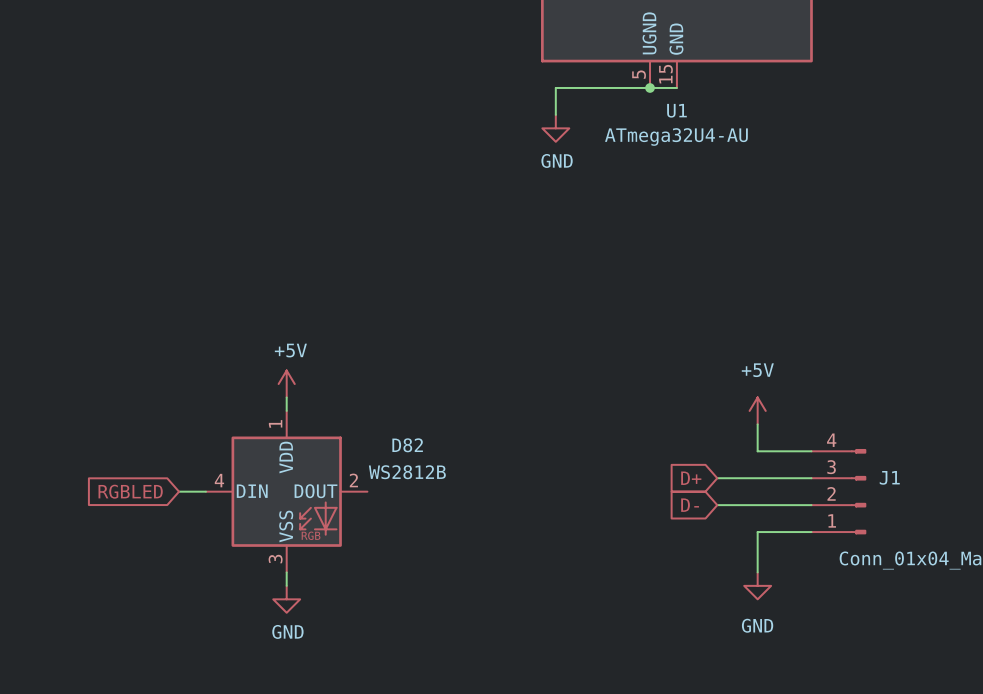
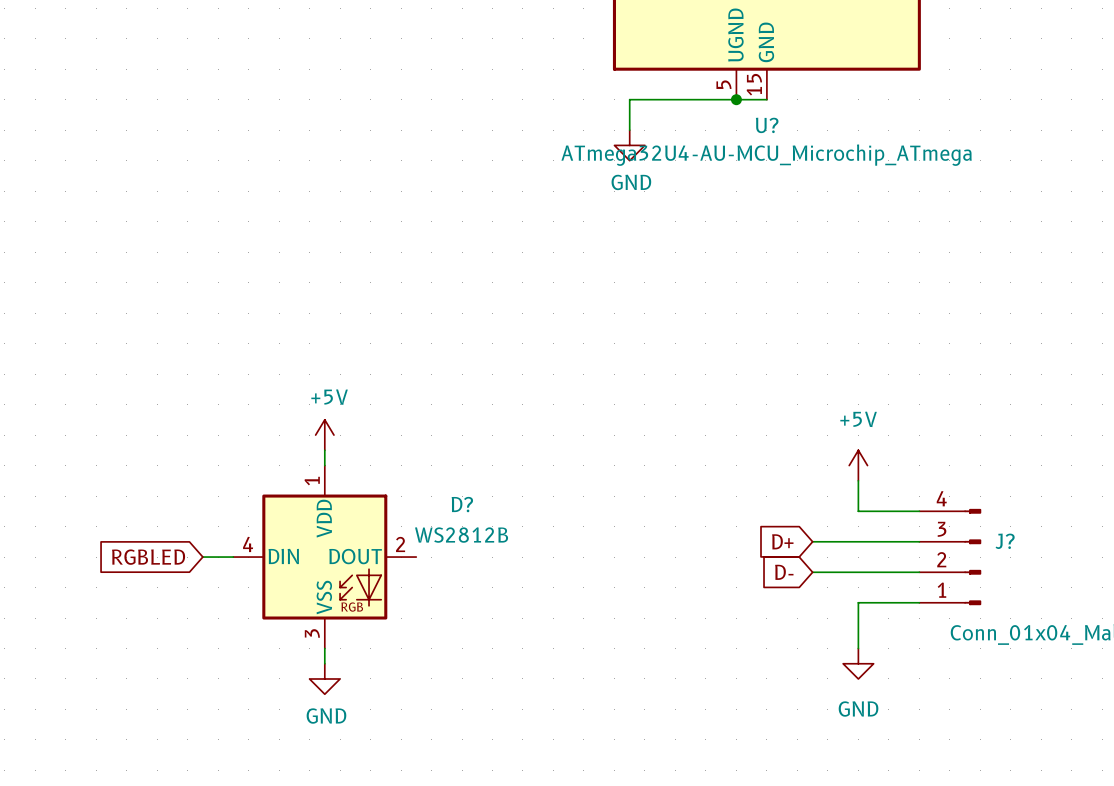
U1 name: U1 (676, 110) -> U? (767, 125)
U1 value: ATmega32U4-AU (676, 136) -> ATmega32U4-AU-MCU_Microchip_ATmega (766, 155)
D82 name: D82 (407, 445) -> D? (462, 504)
J1 name: J1 (889, 477) -> J? (1005, 541)

